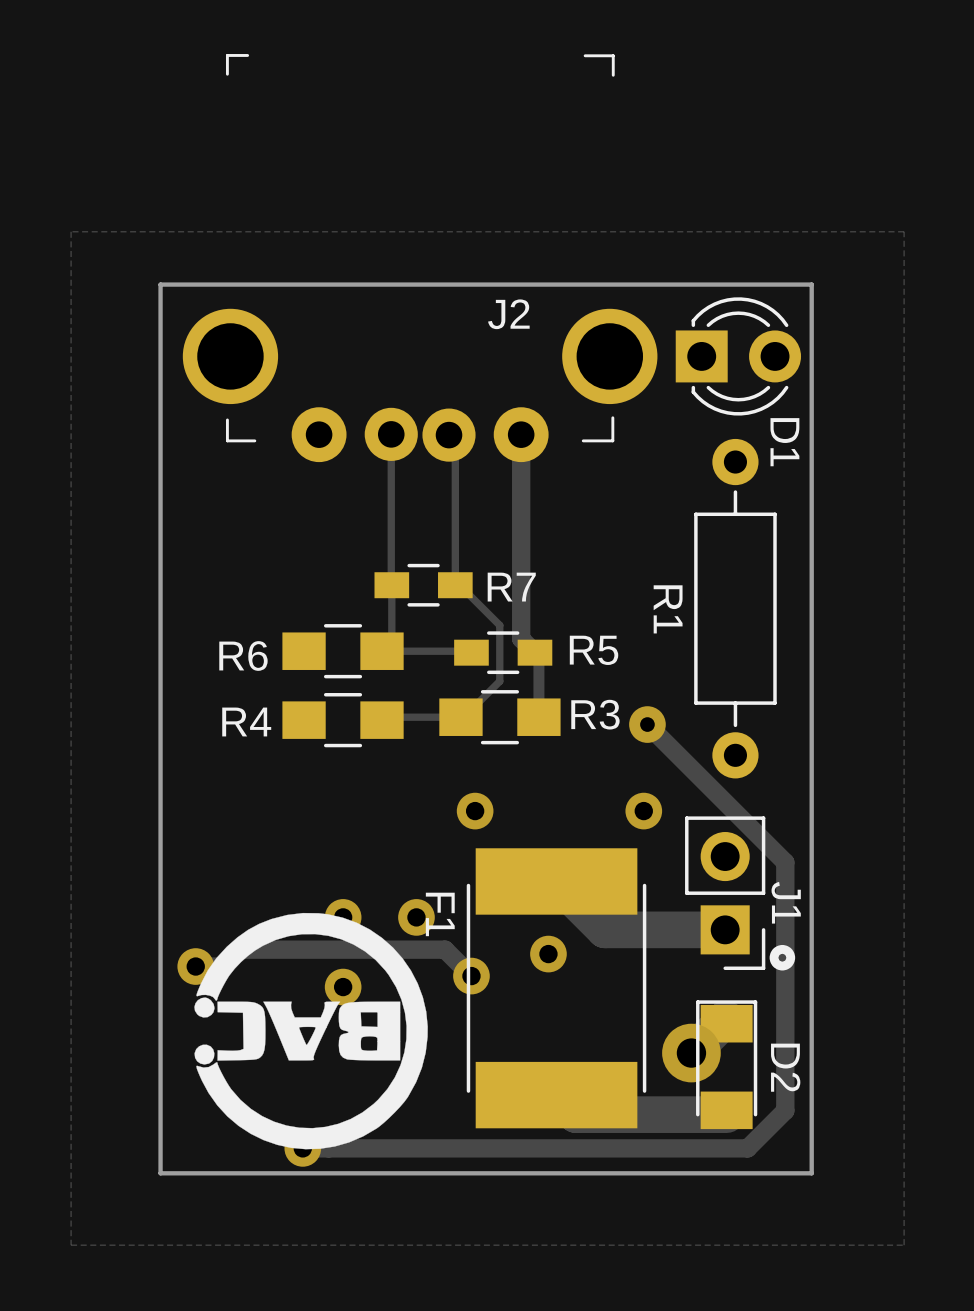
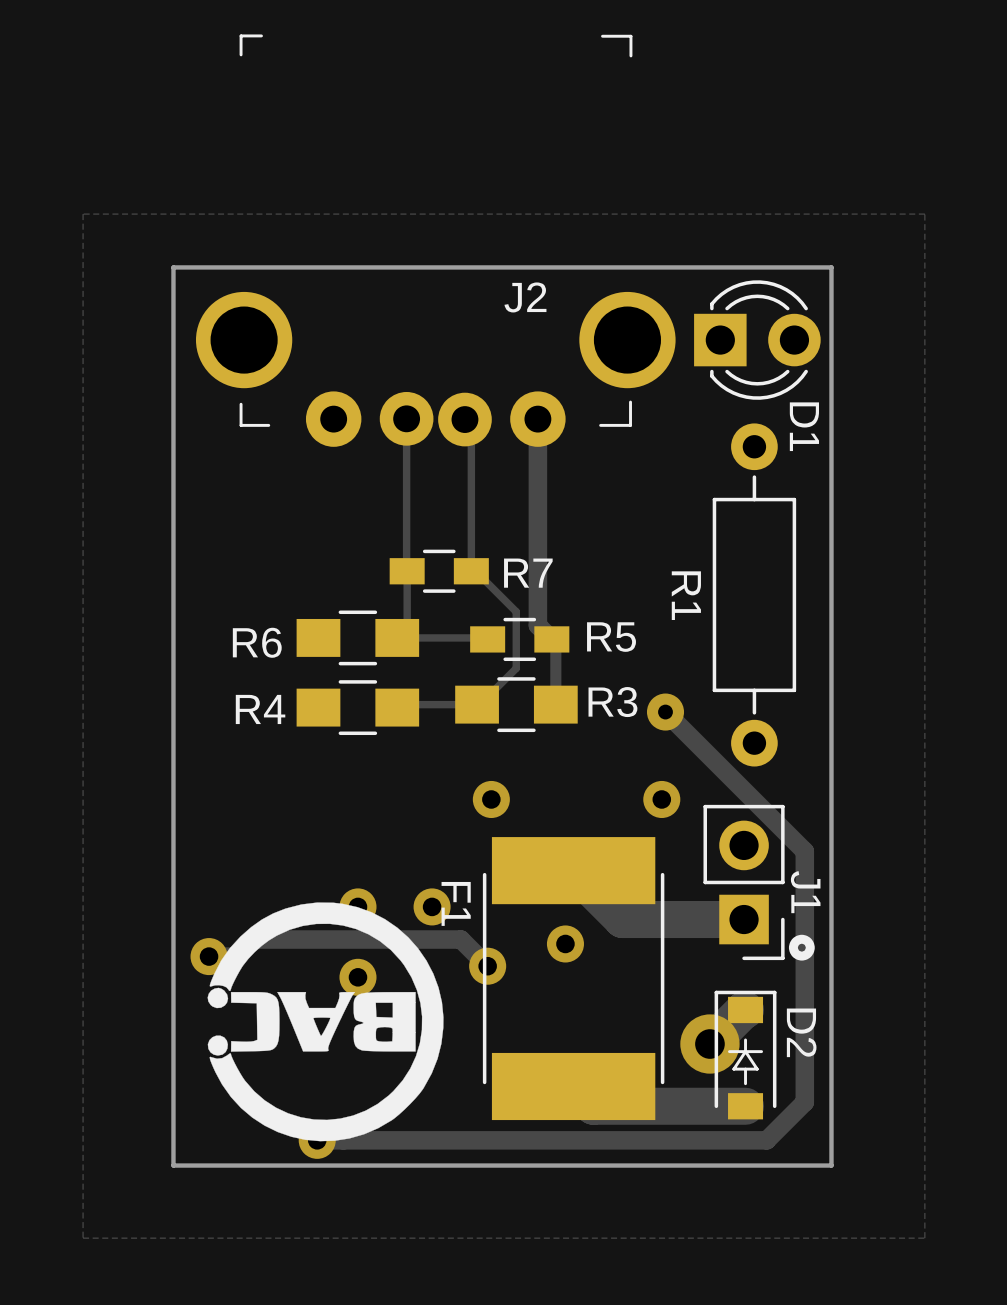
D2 footprint: [696, 1000, 758, 1130] -> [714, 990, 777, 1120]

